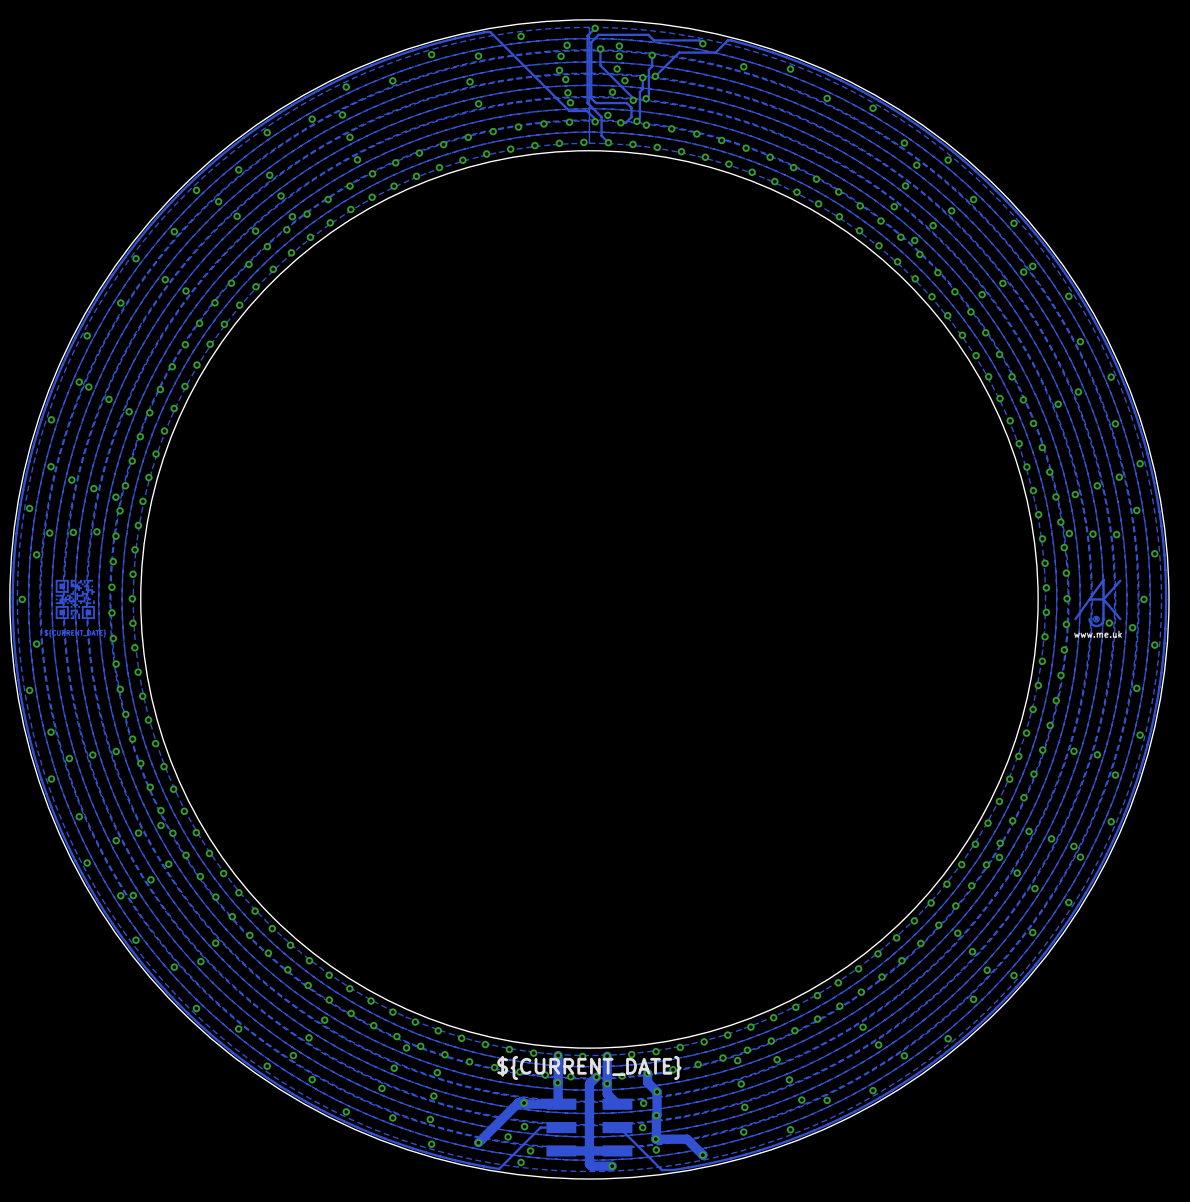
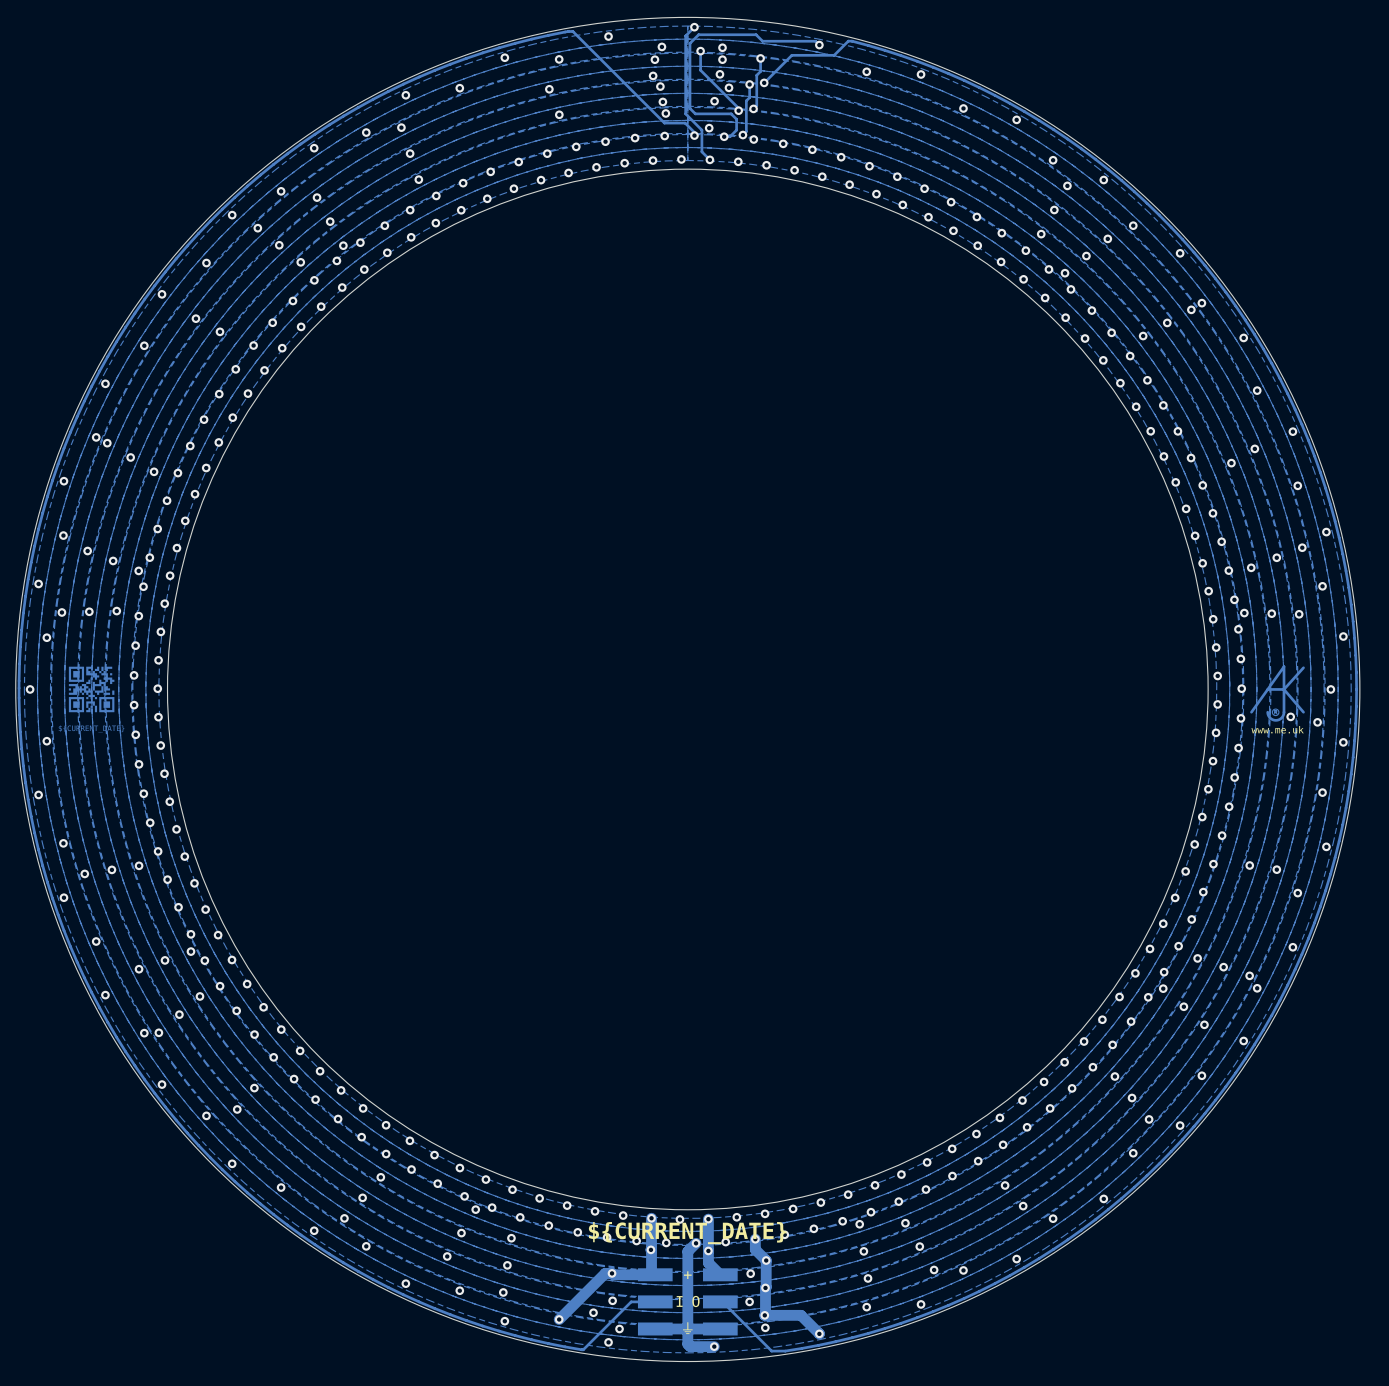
text: none -> + (687, 1275)
text: none -> I (679, 1301)
text: none -> O (695, 1301)
text: none -> ⏚ (687, 1328)

